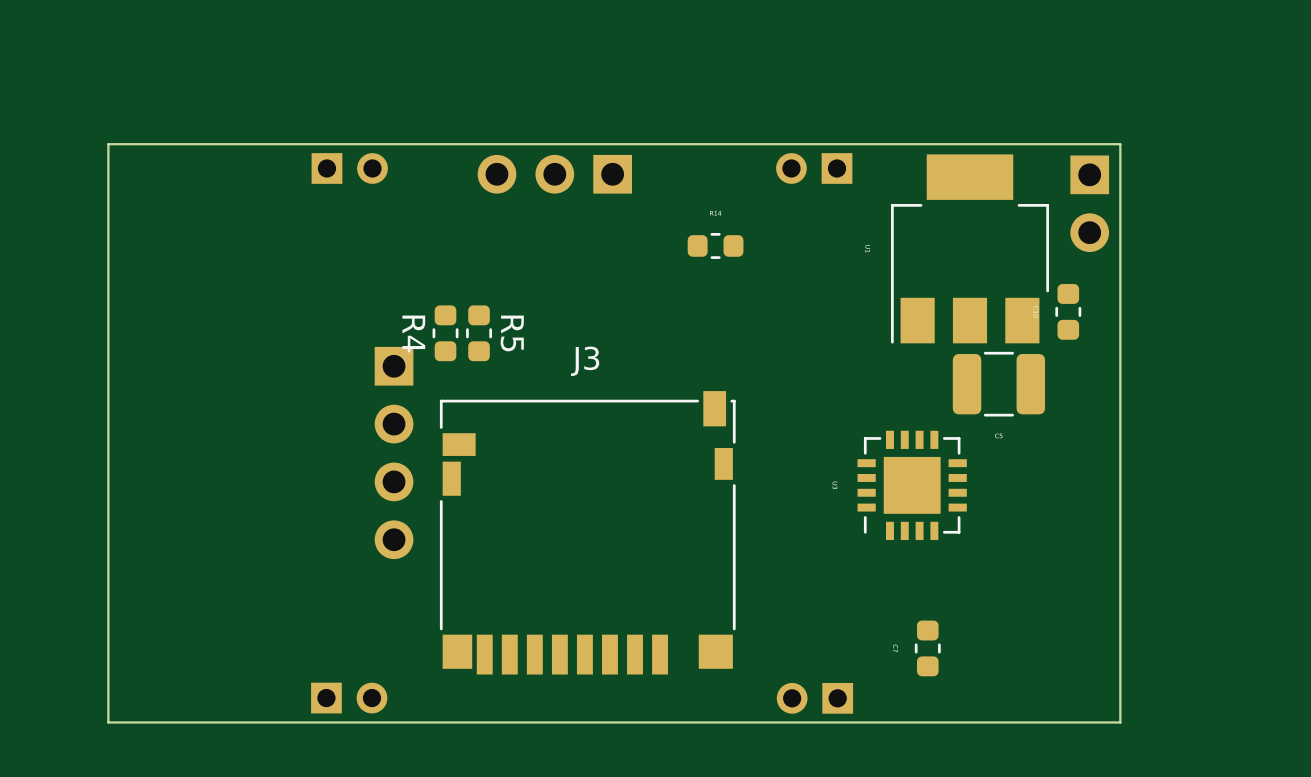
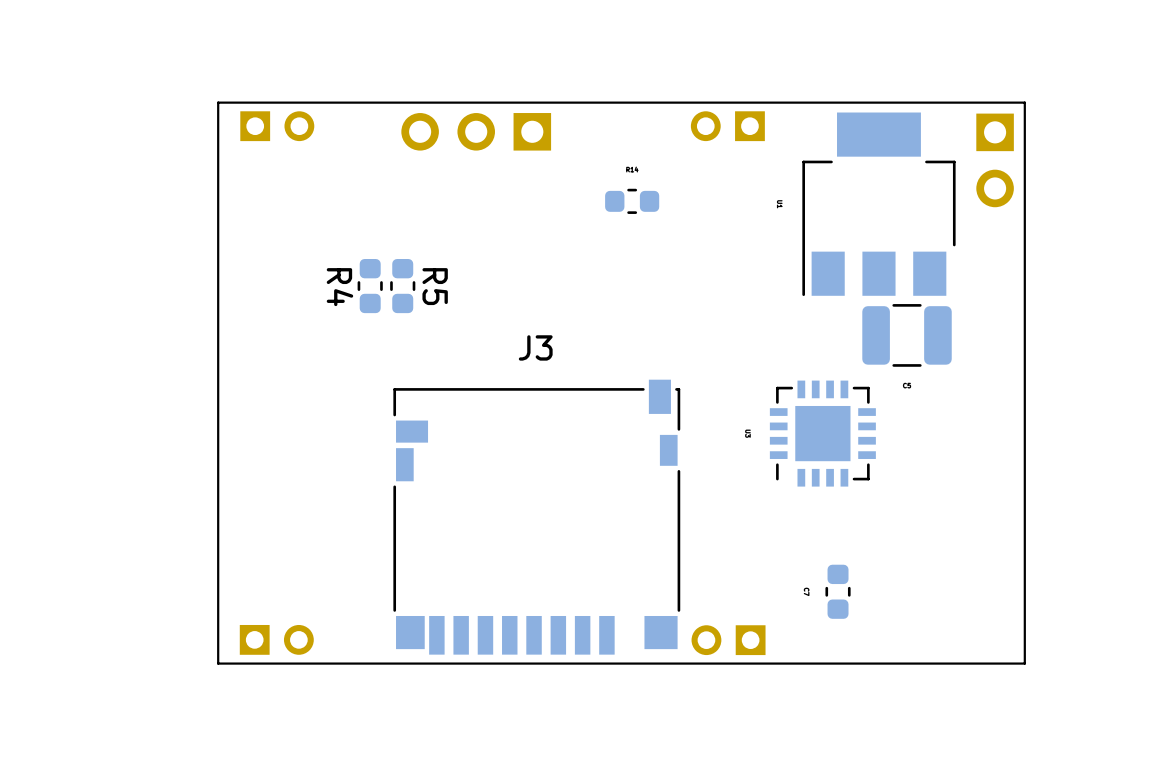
board edge: (288, 144) (108, 144) (108, 722) (288, 722) -> (218, 102) (218, 663)
part: (1068, 311) -> none
part: (394, 452) -> none
J3 position: (587, 532) -> (536, 517)

